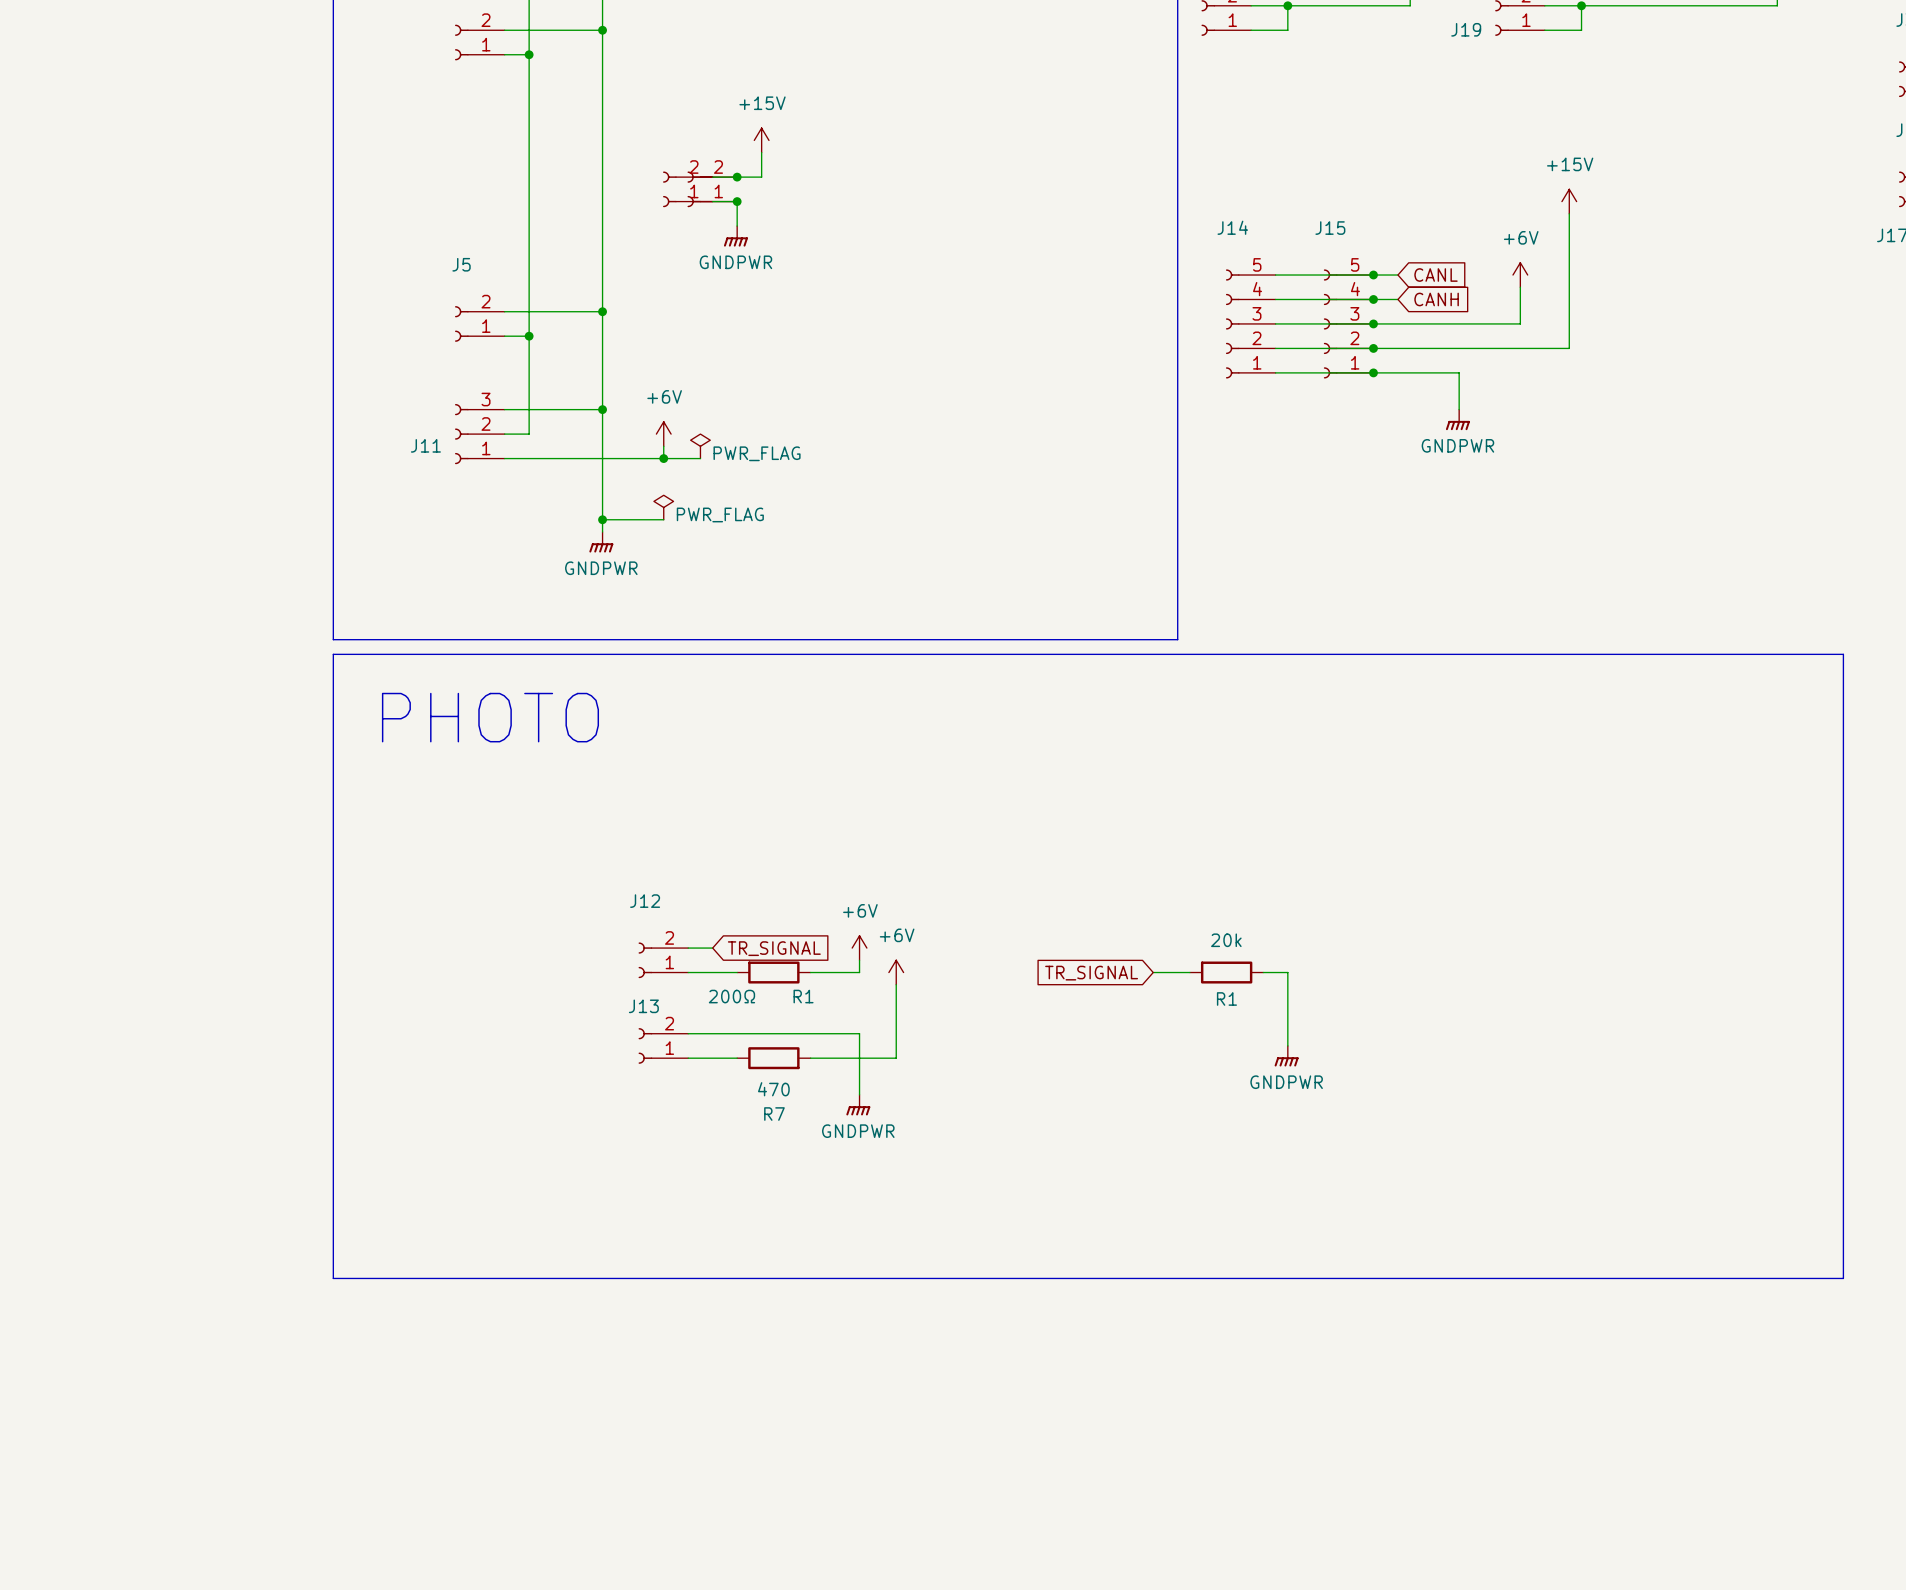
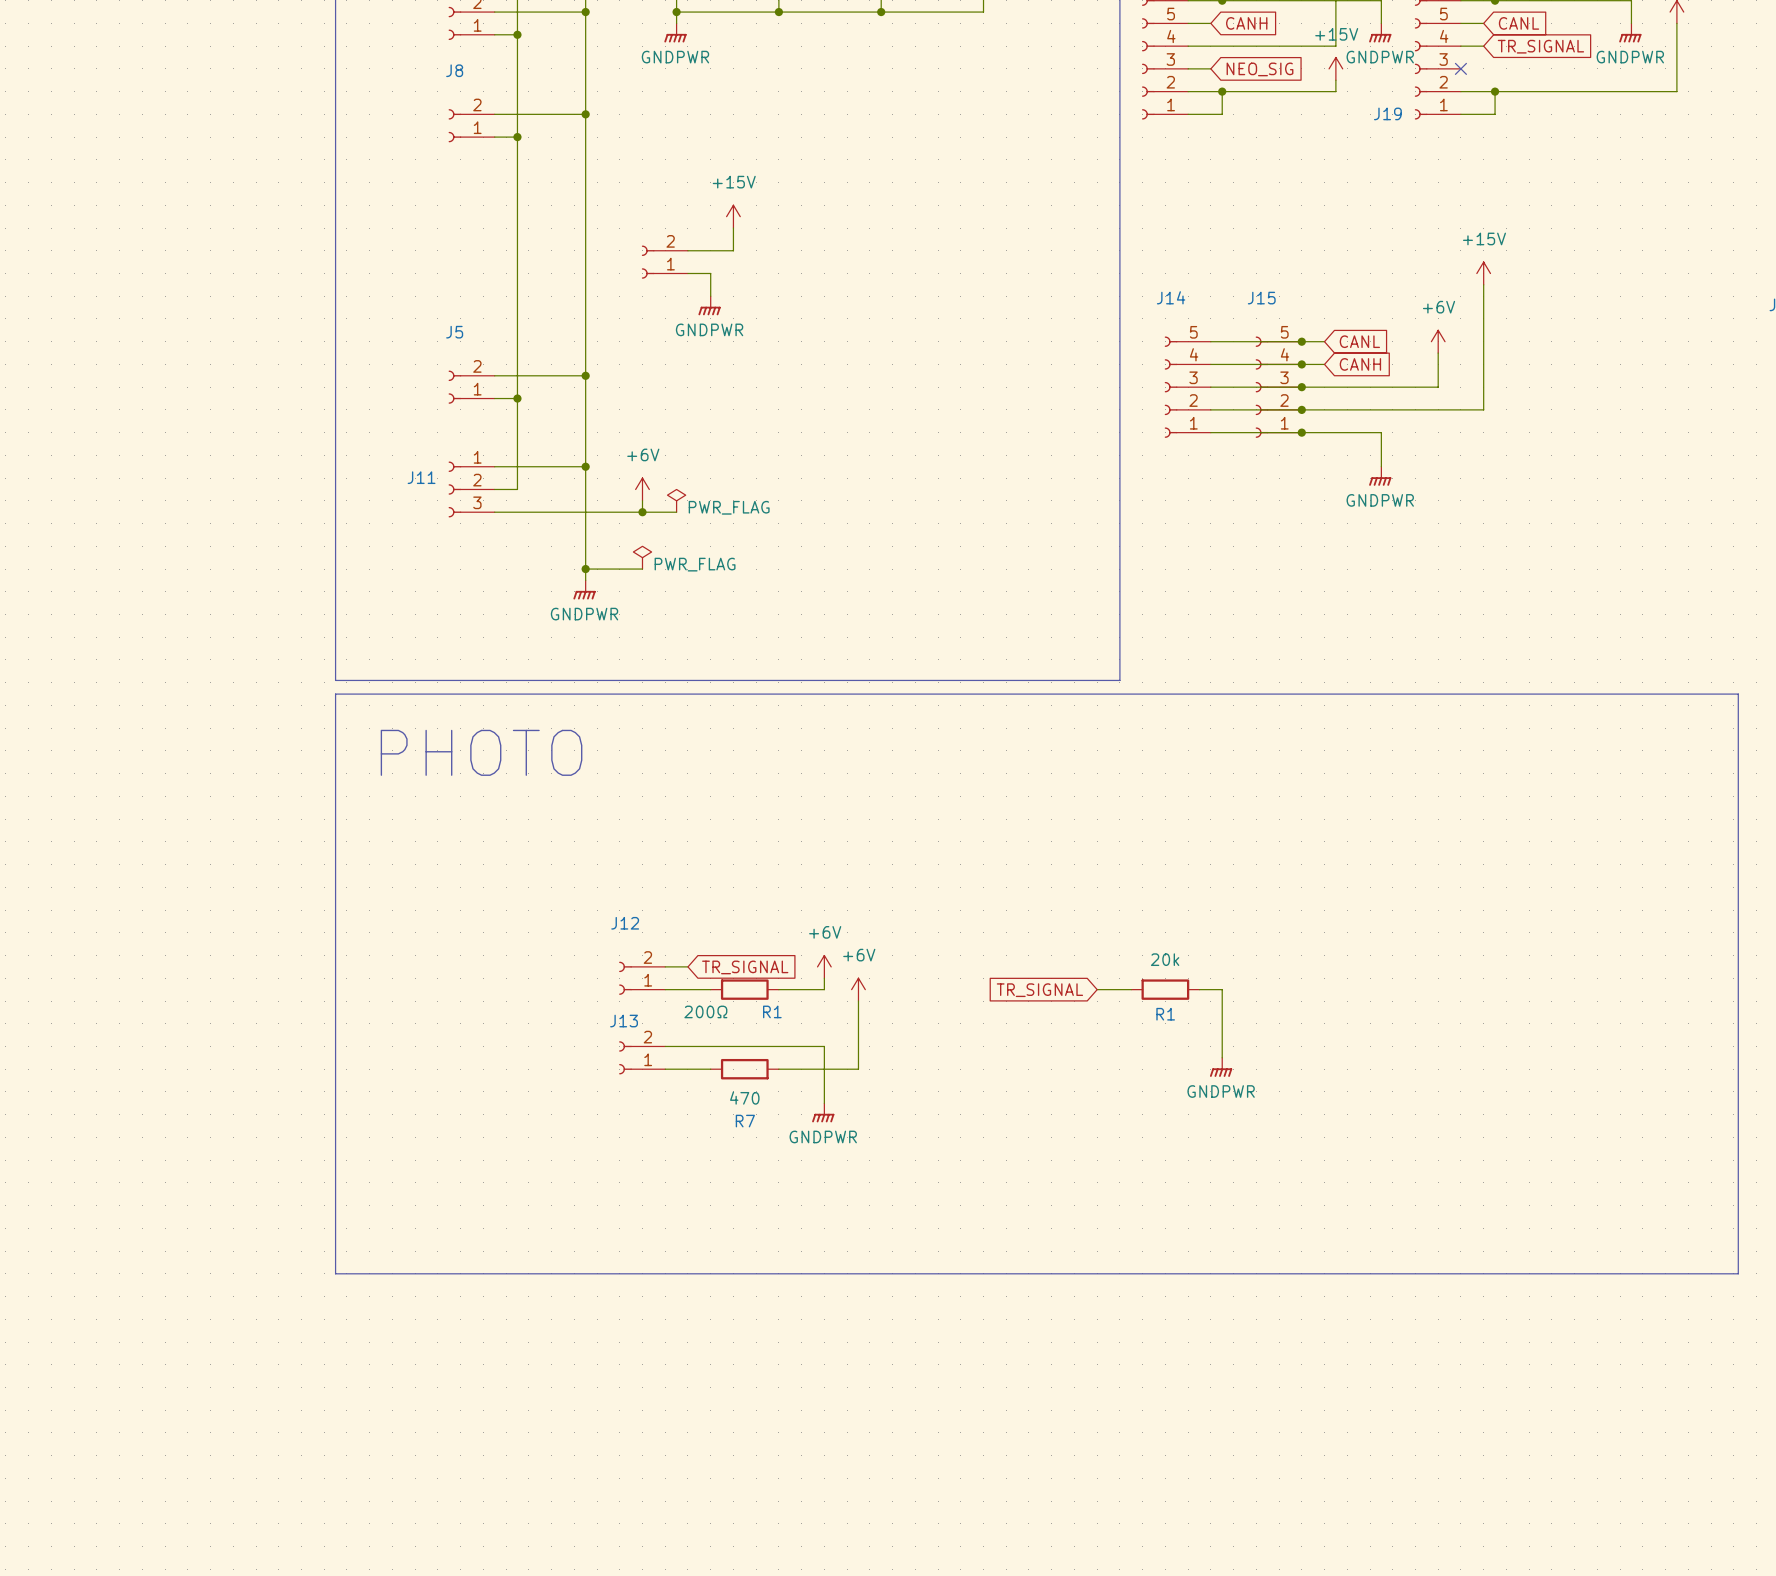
junction: (737, 177) -> none
part: (712, 189) -> none
junction: (737, 201) -> none
J11 flip: as is (461, 434) -> up-down (454, 489)

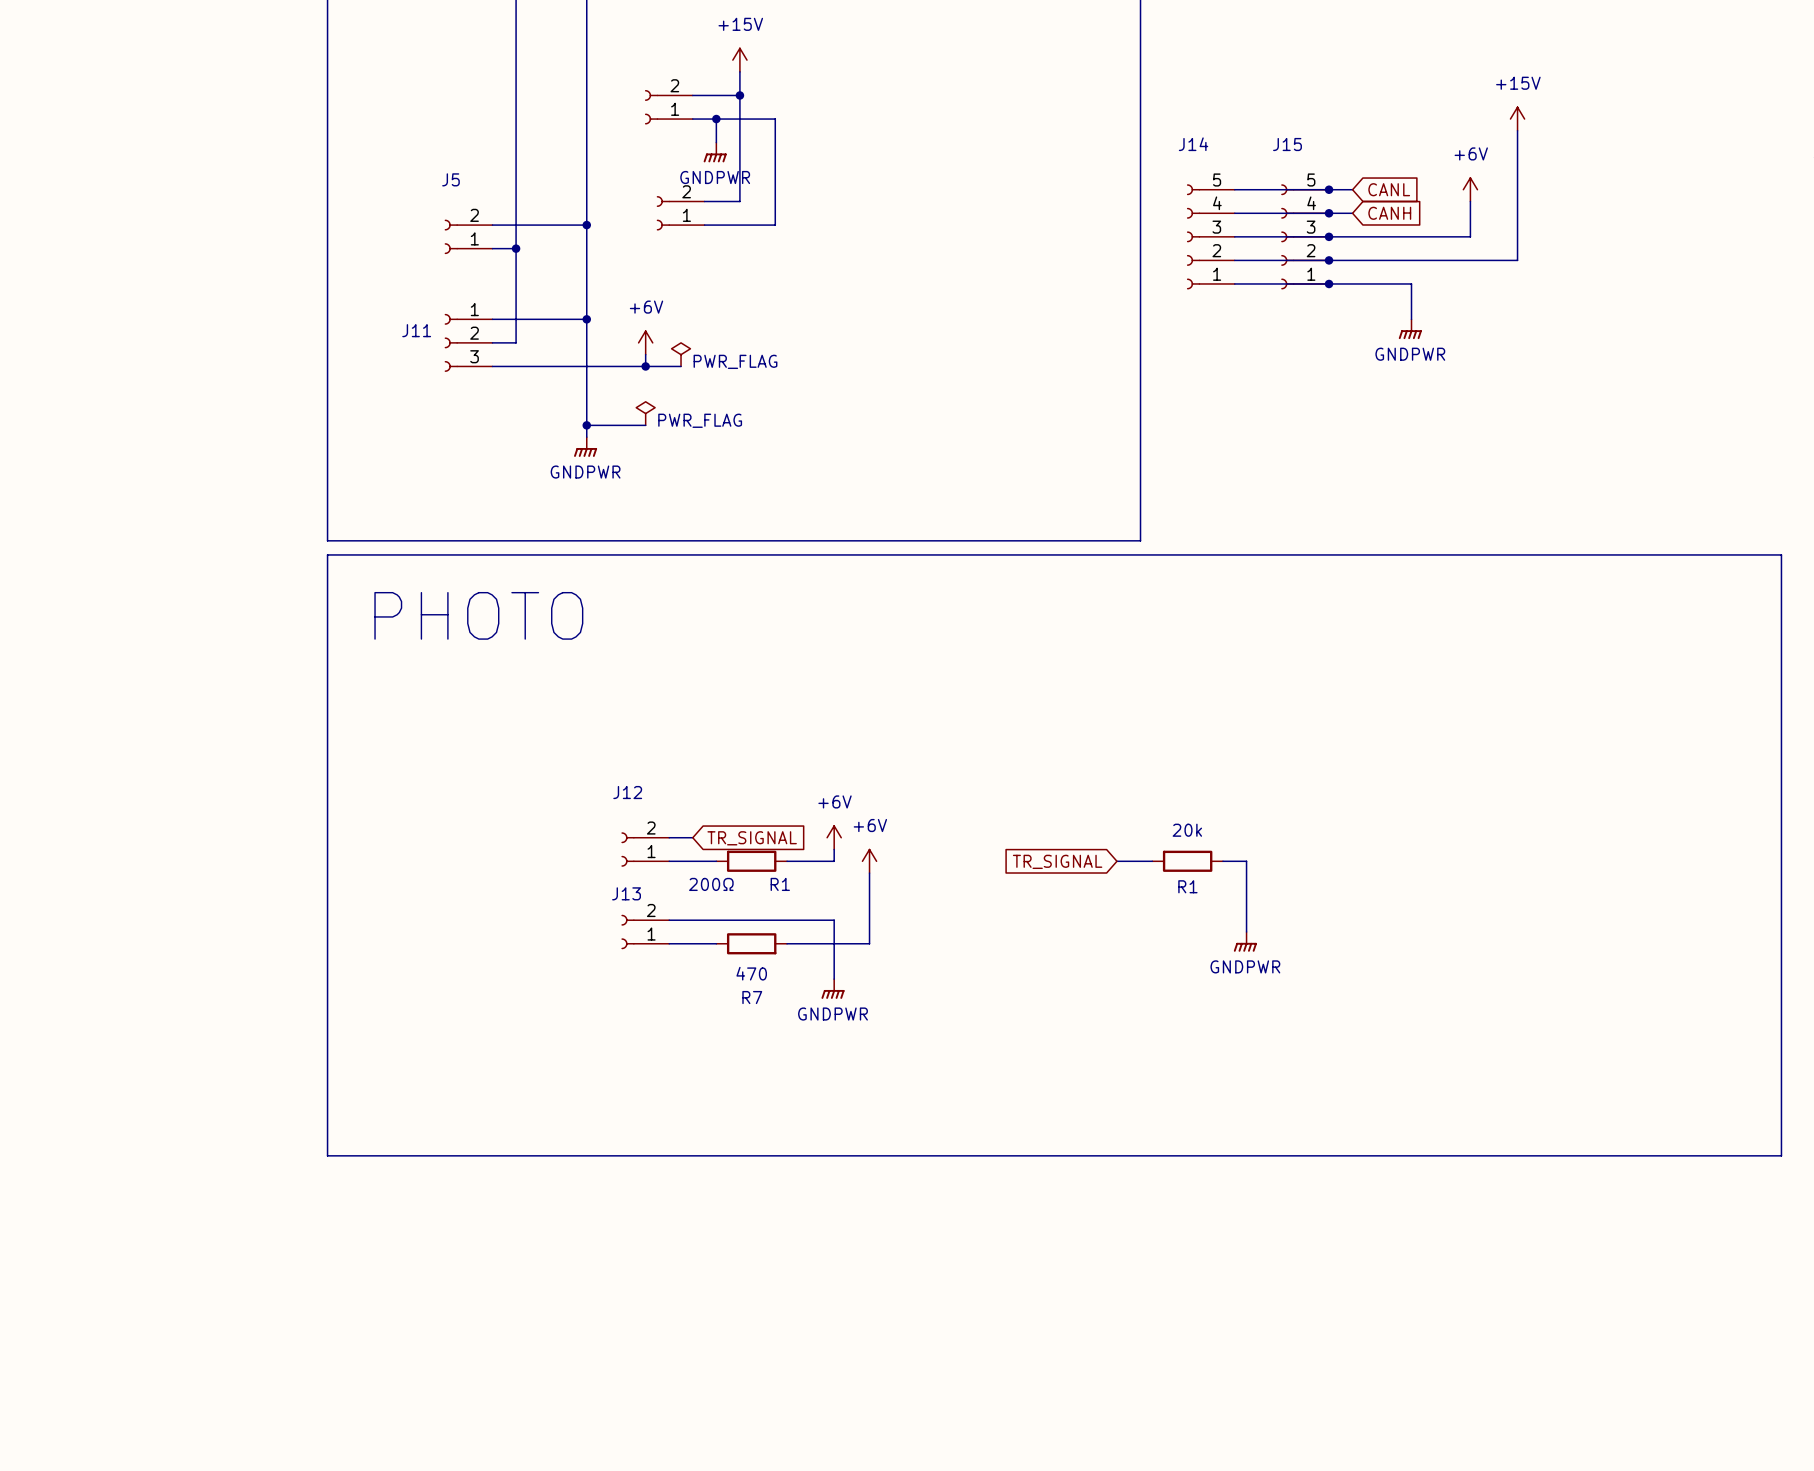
wire: none -> (739, 95) (739, 201) (704, 201)
junction: none -> (739, 95)
wire: none -> (716, 119) (775, 119) (775, 225) (704, 225)
junction: none -> (716, 119)
part: none -> (680, 213)

